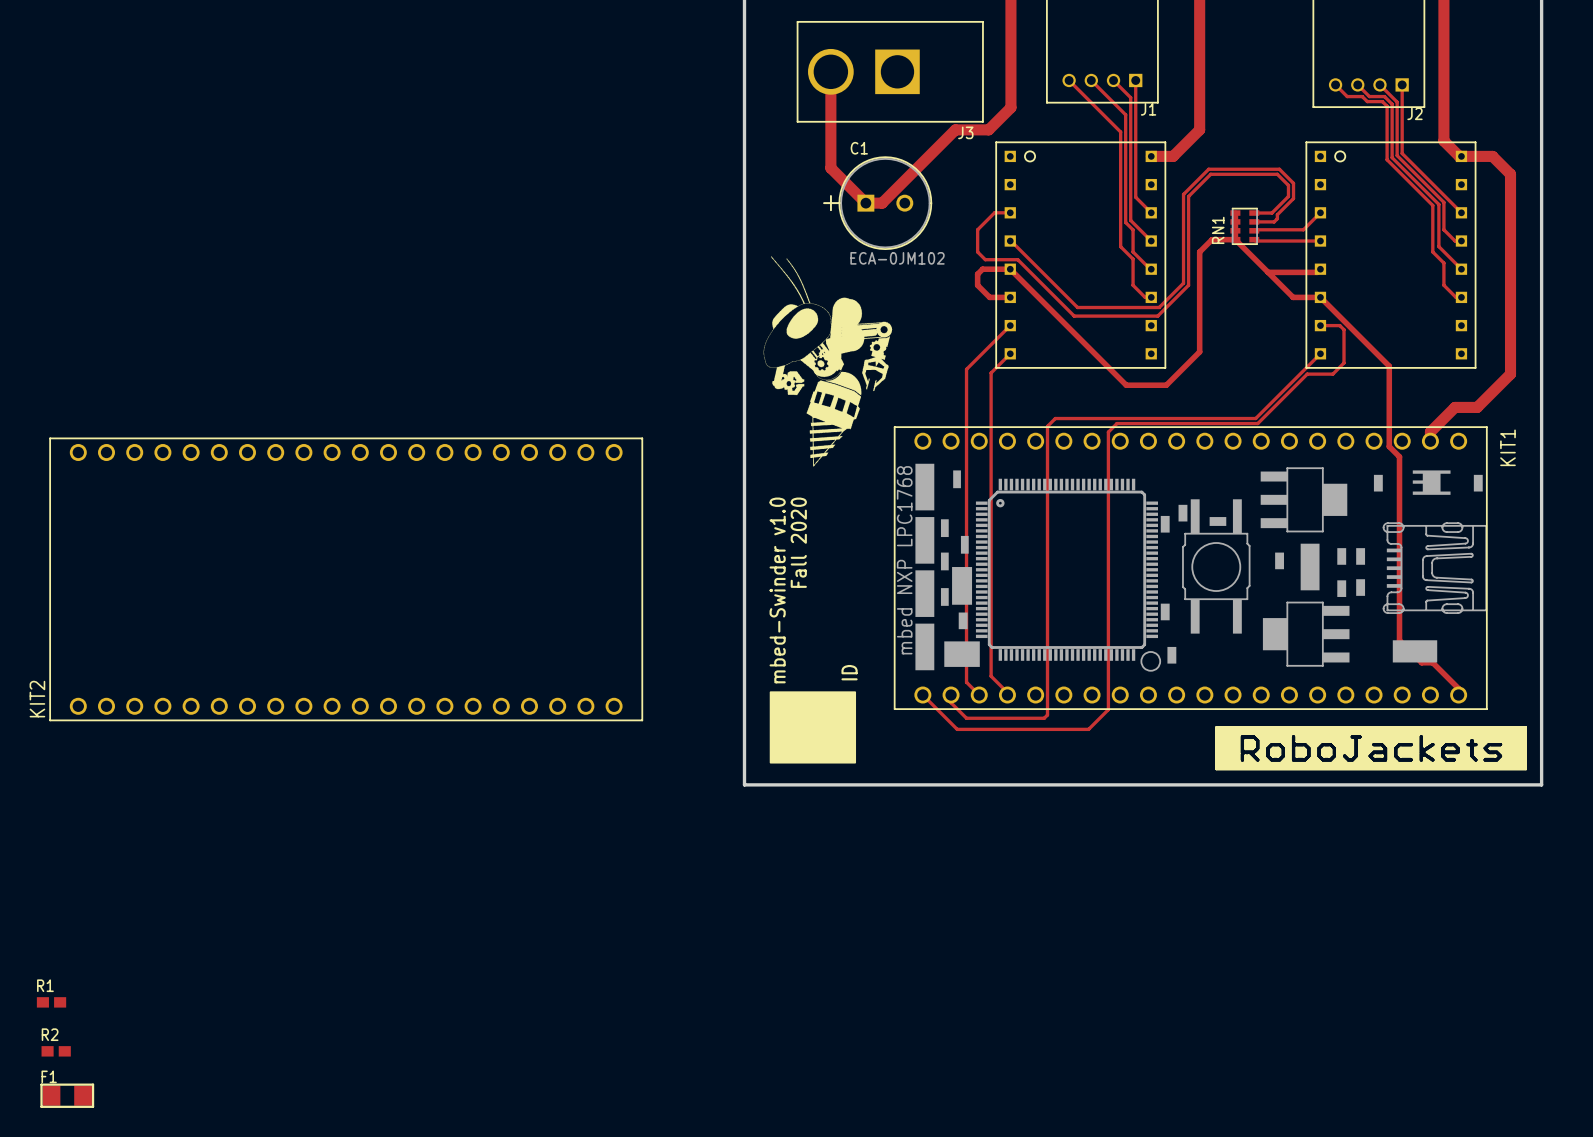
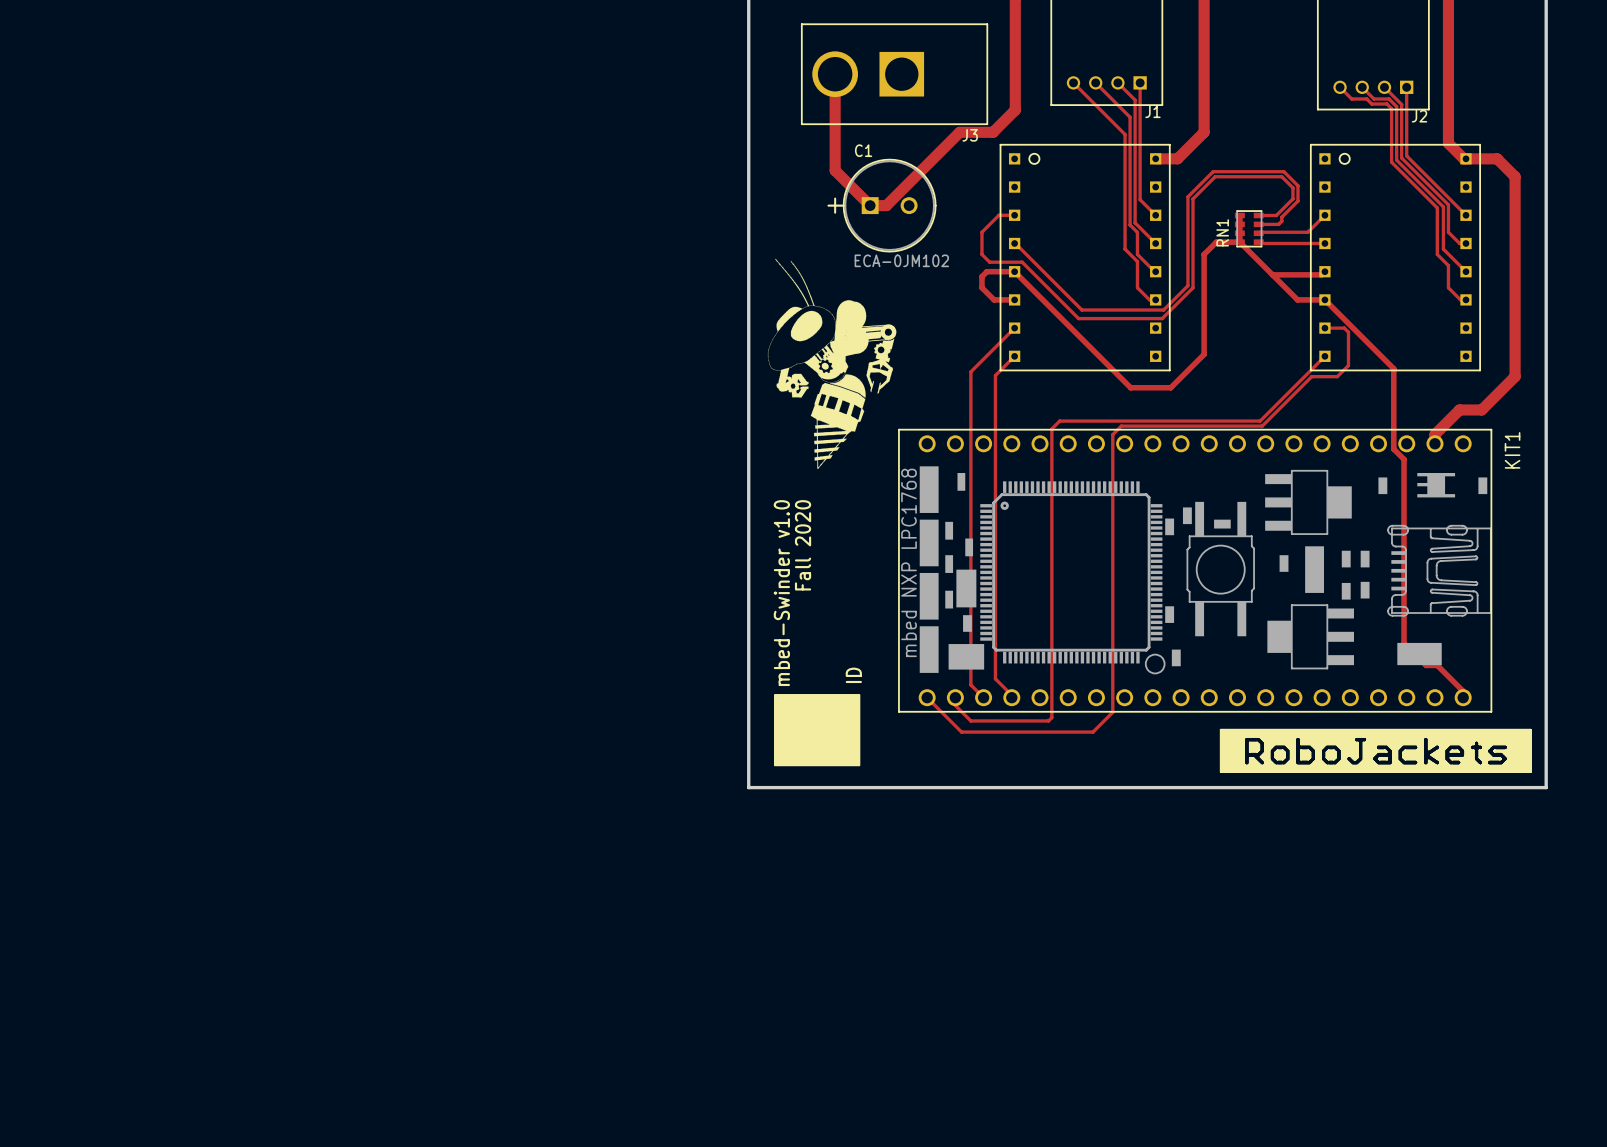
KIT2: (346, 579) -> none
R1: (51, 1002) -> none
R2: (56, 1051) -> none
F1: (67, 1095) -> none

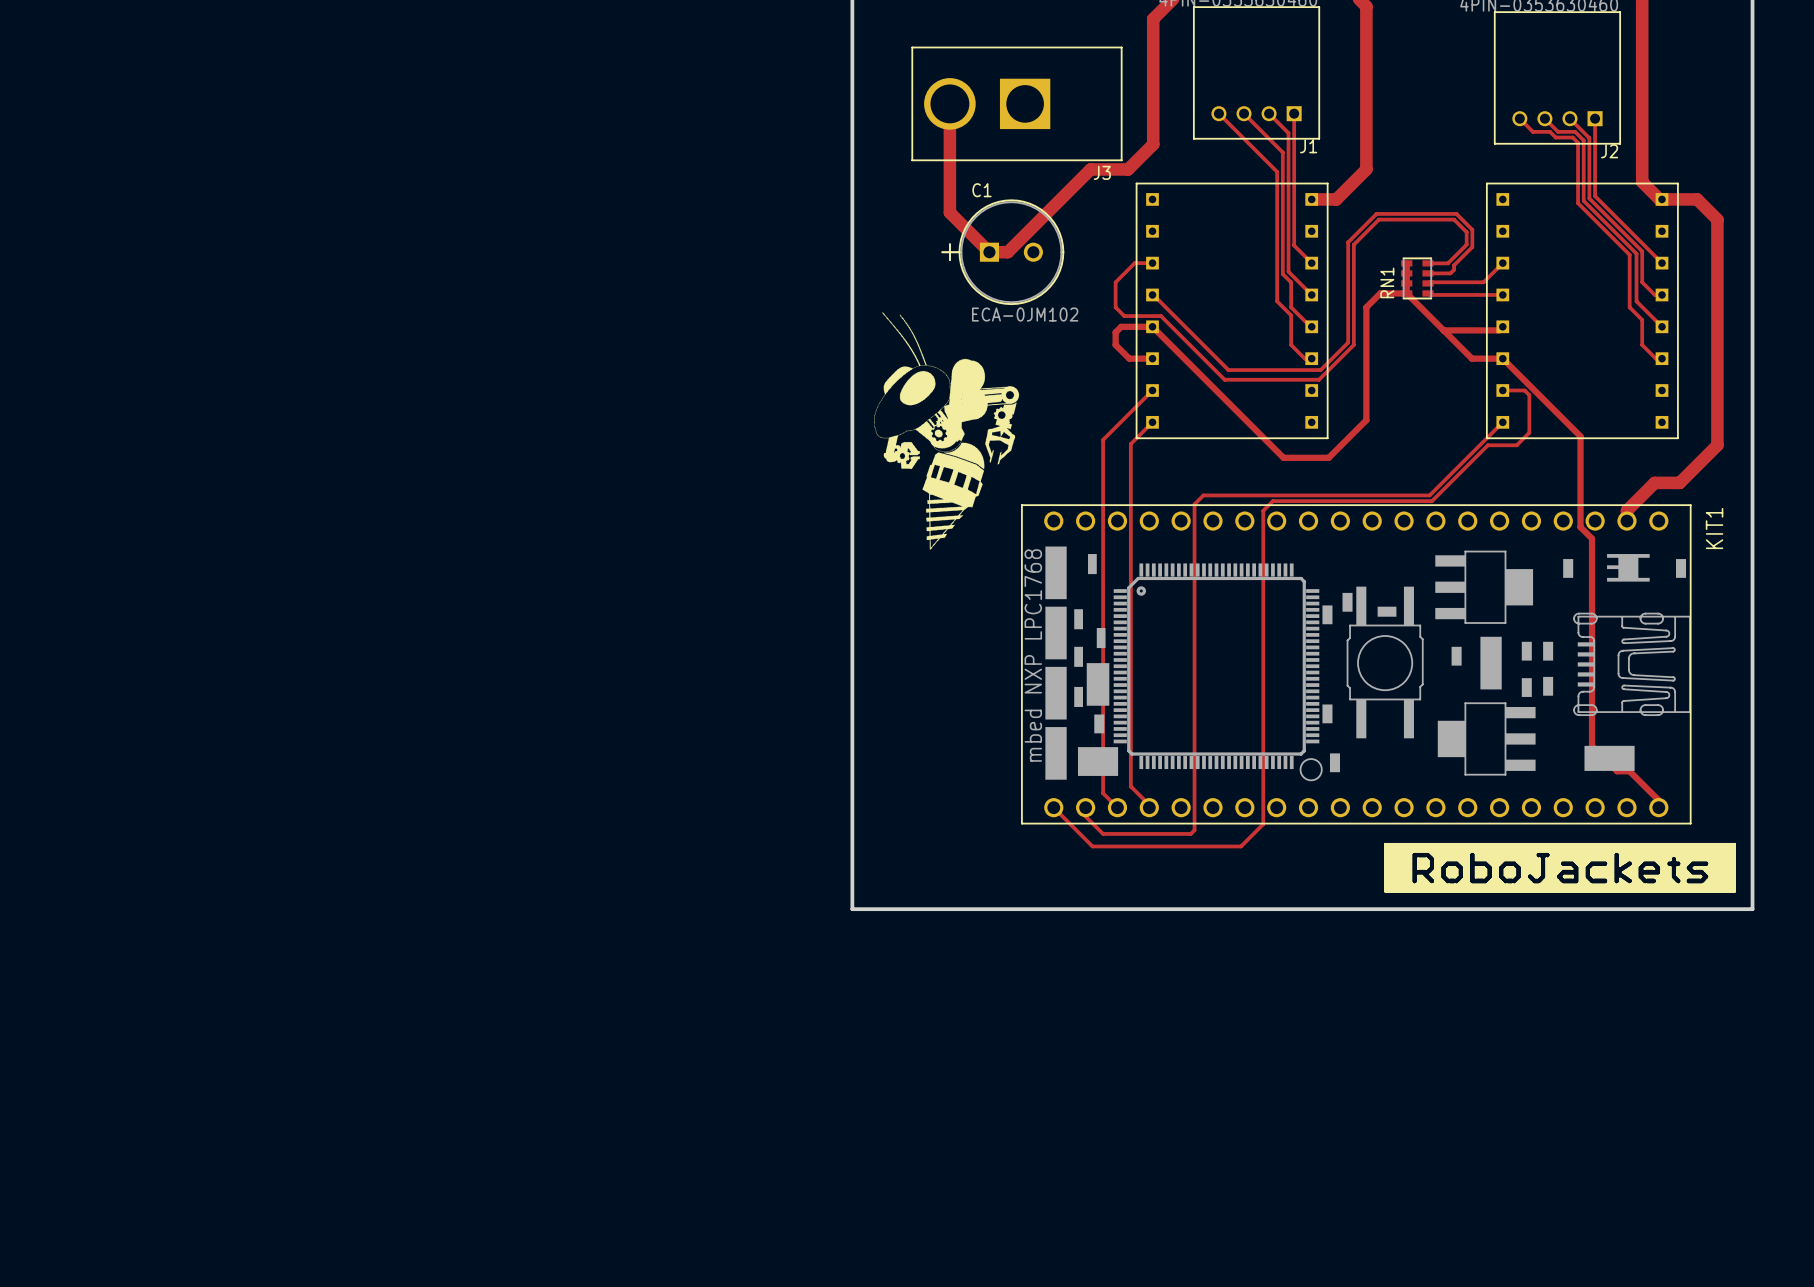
part footprint: [999, 144, 1171, 372] -> [1135, 182, 1329, 440]
part footprint: [1310, 144, 1481, 372] -> [1486, 182, 1679, 440]
text: Fall 2020 (803, 545) -> none
text: mbed-Swinder v1.0 (781, 593) -> none
text: ID (853, 675) -> none
drawing: [773, 694, 861, 767] -> none

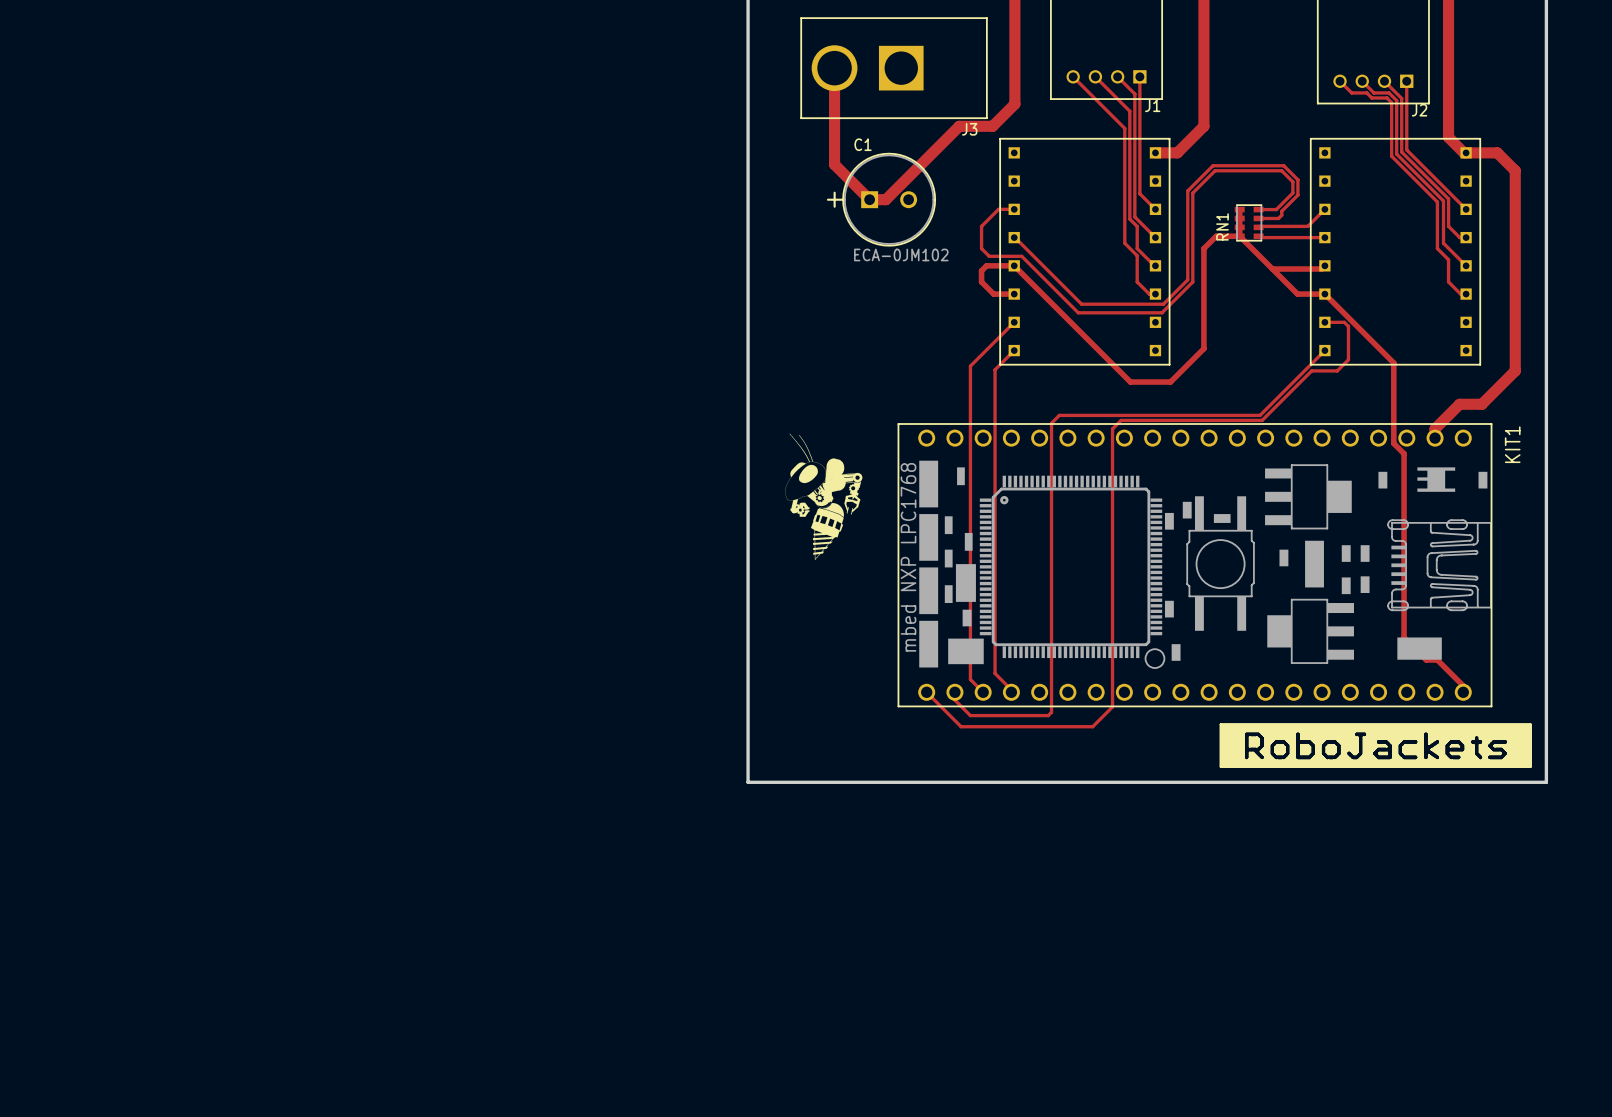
drawing: [874, 312, 1020, 550] -> none
drawing: none -> [785, 433, 863, 560]

